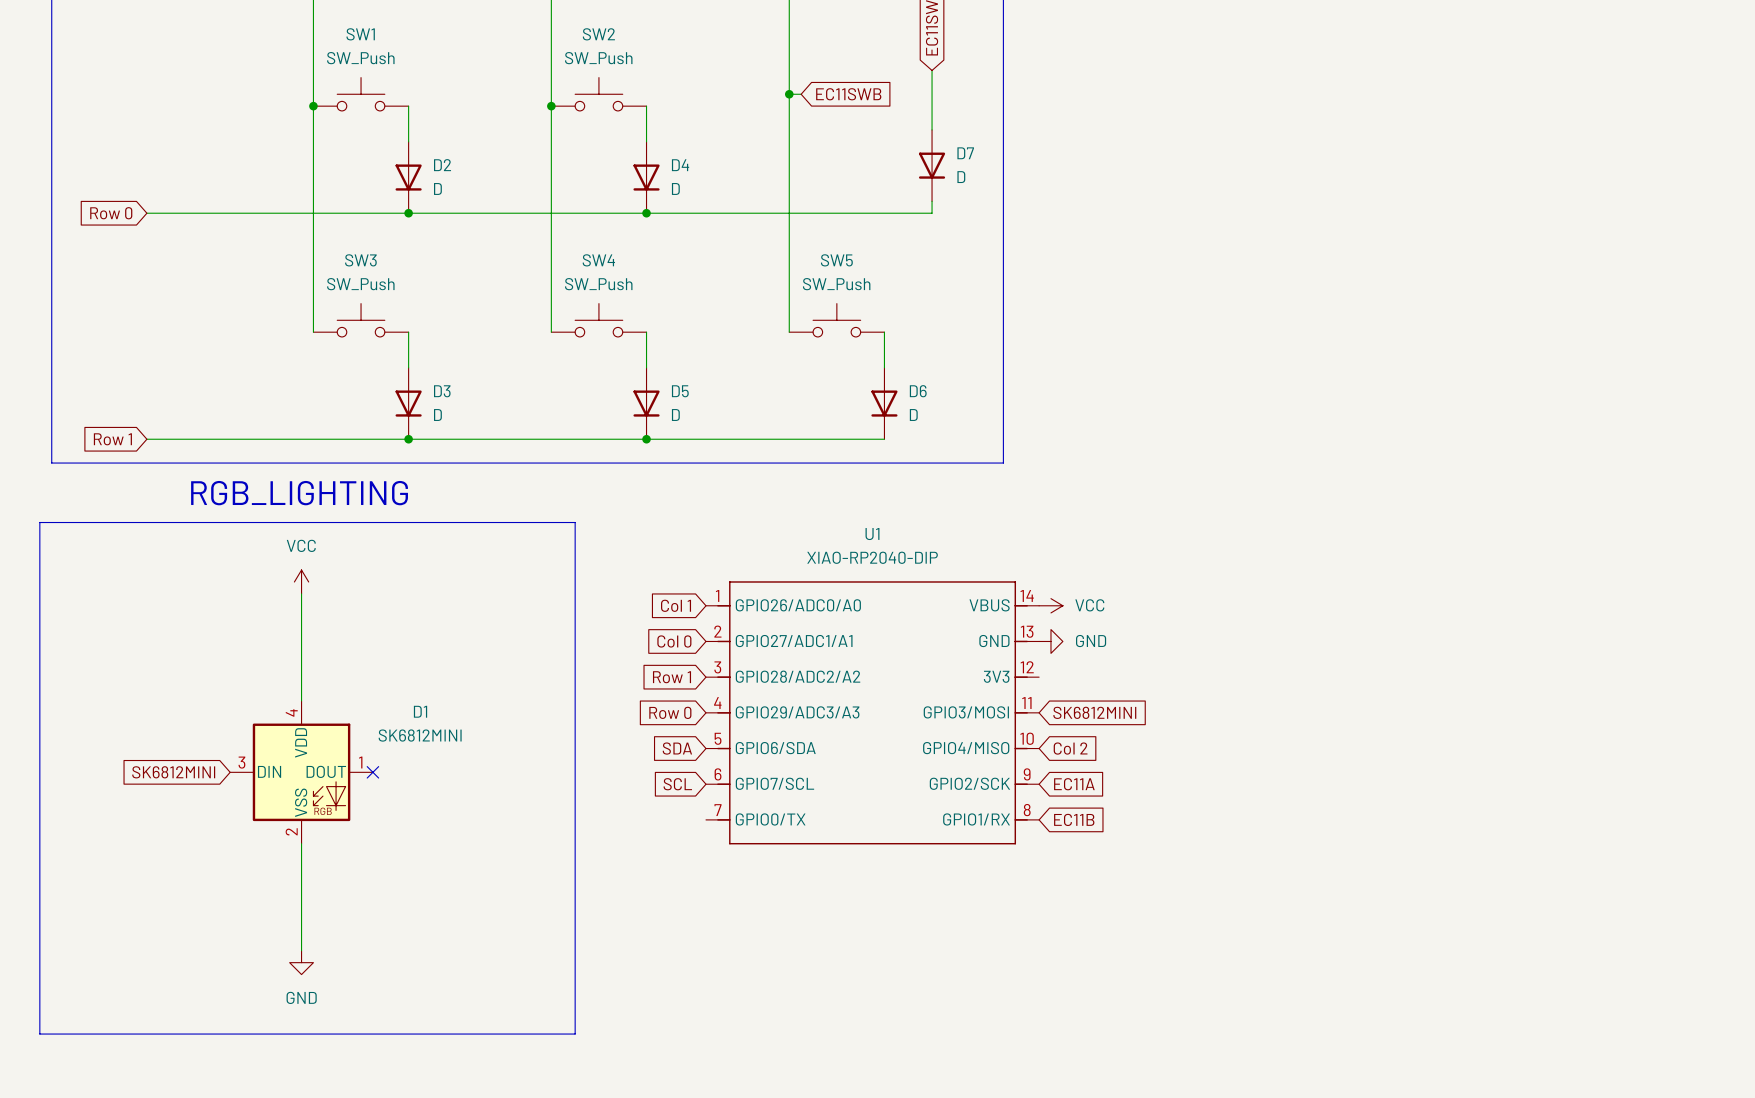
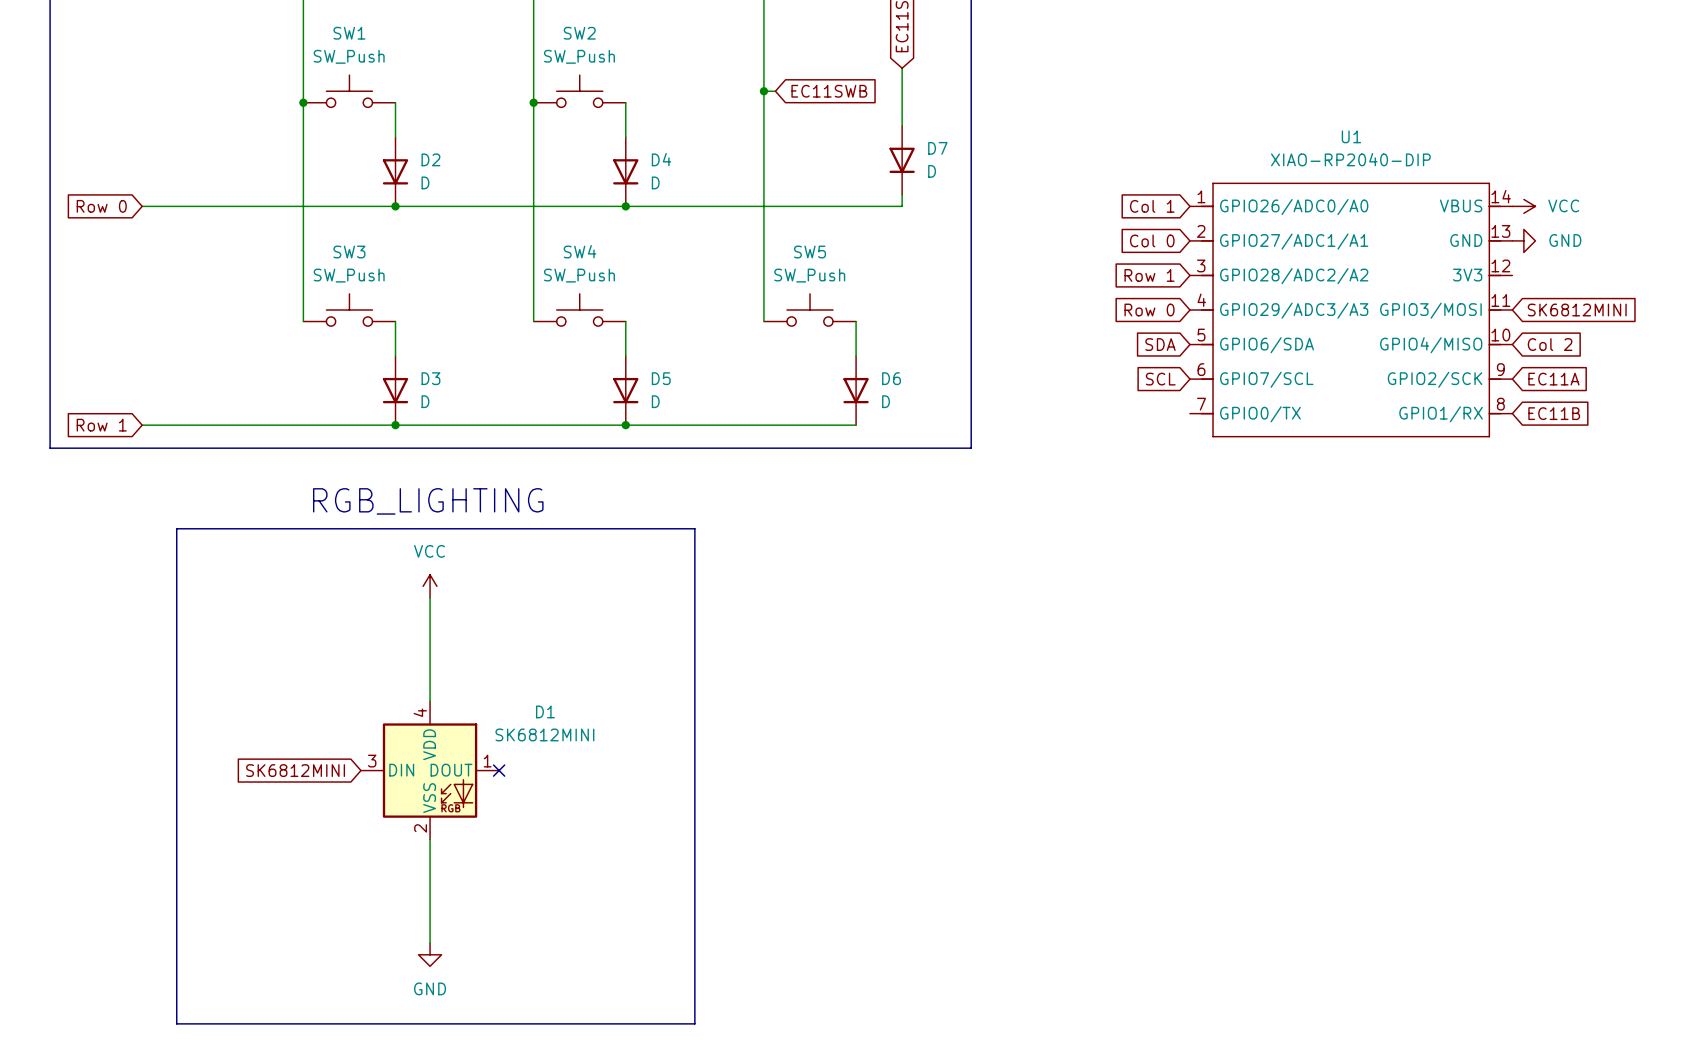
global label: none -> Col 1 (1152, 206)
power symbol: none -> VCC (1523, 206)
global label: none -> Col 0 (1152, 240)
power symbol: none -> GND (1523, 240)
global label: none -> Row 1 (1149, 275)
global label: none -> Row 0 (1149, 310)
global label: none -> SK6812MINI (1577, 310)
global label: none -> SDA (1160, 344)
global label: none -> Col 2 (1550, 344)
global label: none -> SCL (1160, 379)
global label: none -> EC11A (1553, 379)
global label: none -> EC11B (1554, 413)
text position: RGB_LIGHTING (299, 493) -> RGB_LIGHTING (428, 501)
line: (39, 522) (575, 522) (575, 1034) (39, 1034) (39, 522) -> (176, 528) (694, 528) (694, 1023) (176, 1023) (176, 528)
power symbol position: VCC (301, 581) -> VCC (430, 586)
wire: (301, 593) (301, 700) -> (430, 597) (430, 701)
global label: Col 1 (676, 605) -> none
power symbol: VCC (1050, 605) -> none
global label: Col 0 (674, 641) -> none
power symbol: GND (1050, 641) -> none
global label: Row 1 (672, 677) -> none
global label: Row 0 (670, 712) -> none
U1 position: (872, 712) -> (1351, 310)
global label: SK6812MINI (1094, 712) -> none
global label: SDA (677, 748) -> none
global label: Col 2 (1070, 748) -> none
global label position: SK6812MINI (173, 772) -> SK6812MINI (295, 770)
D1 position: (301, 772) -> (430, 770)
no-connect mark: (372, 772) -> none
global label: SCL (677, 784) -> none
global label: EC11A (1074, 784) -> none
no-connect mark: none -> (499, 770)
global label: EC11B (1074, 819) -> none
wire: (301, 843) (301, 950) -> (430, 839) (430, 943)
power symbol position: GND (301, 962) -> GND (430, 954)

